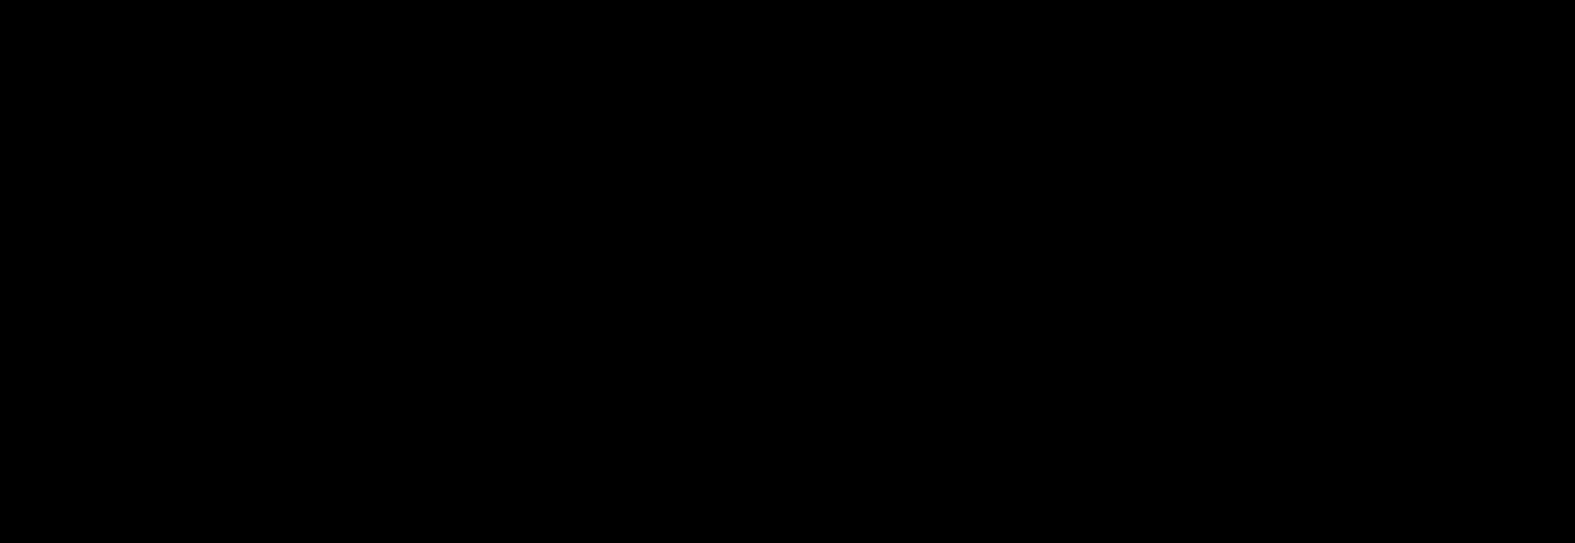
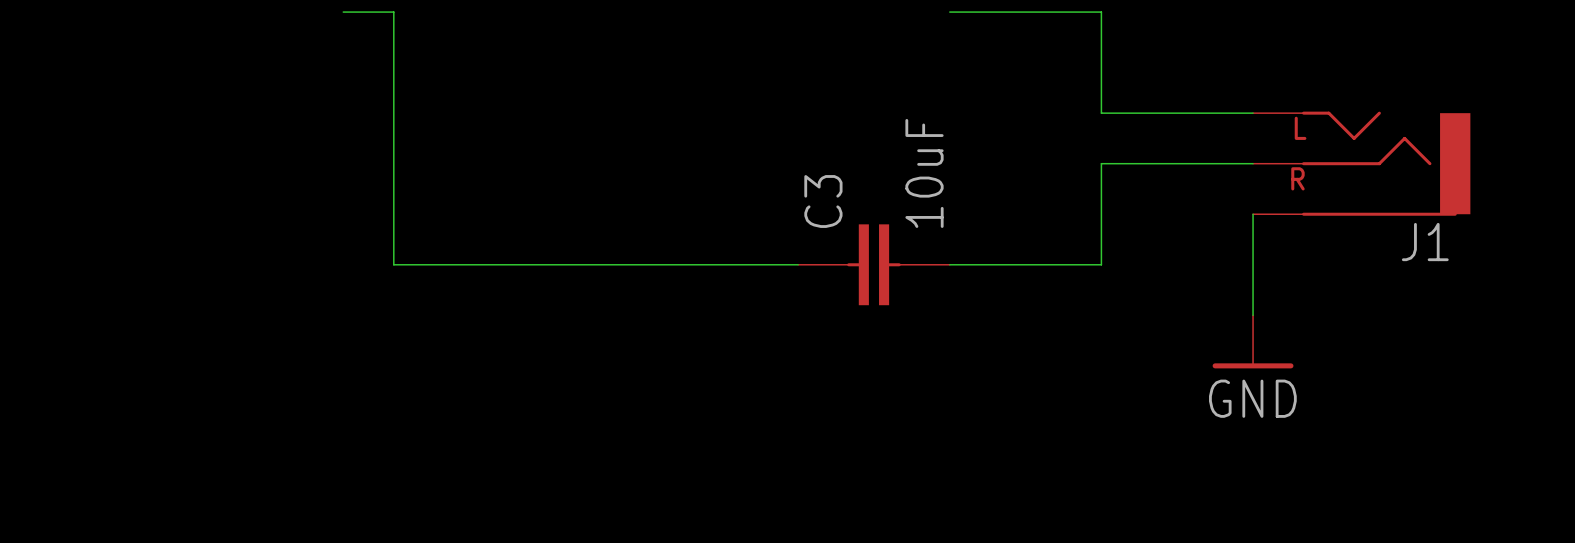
wire: none -> (343, 12) (393, 12) (393, 264) (798, 264)
wire: none -> (949, 12) (1101, 12) (1101, 113) (1253, 113)
wire: none -> (1253, 163) (1101, 163) (1101, 264) (949, 264)
J1: none -> (1361, 163)
wire: none -> (1253, 214) (1253, 315)
C3: none -> 10uF (873, 264)
power symbol: none -> GND (1253, 341)

